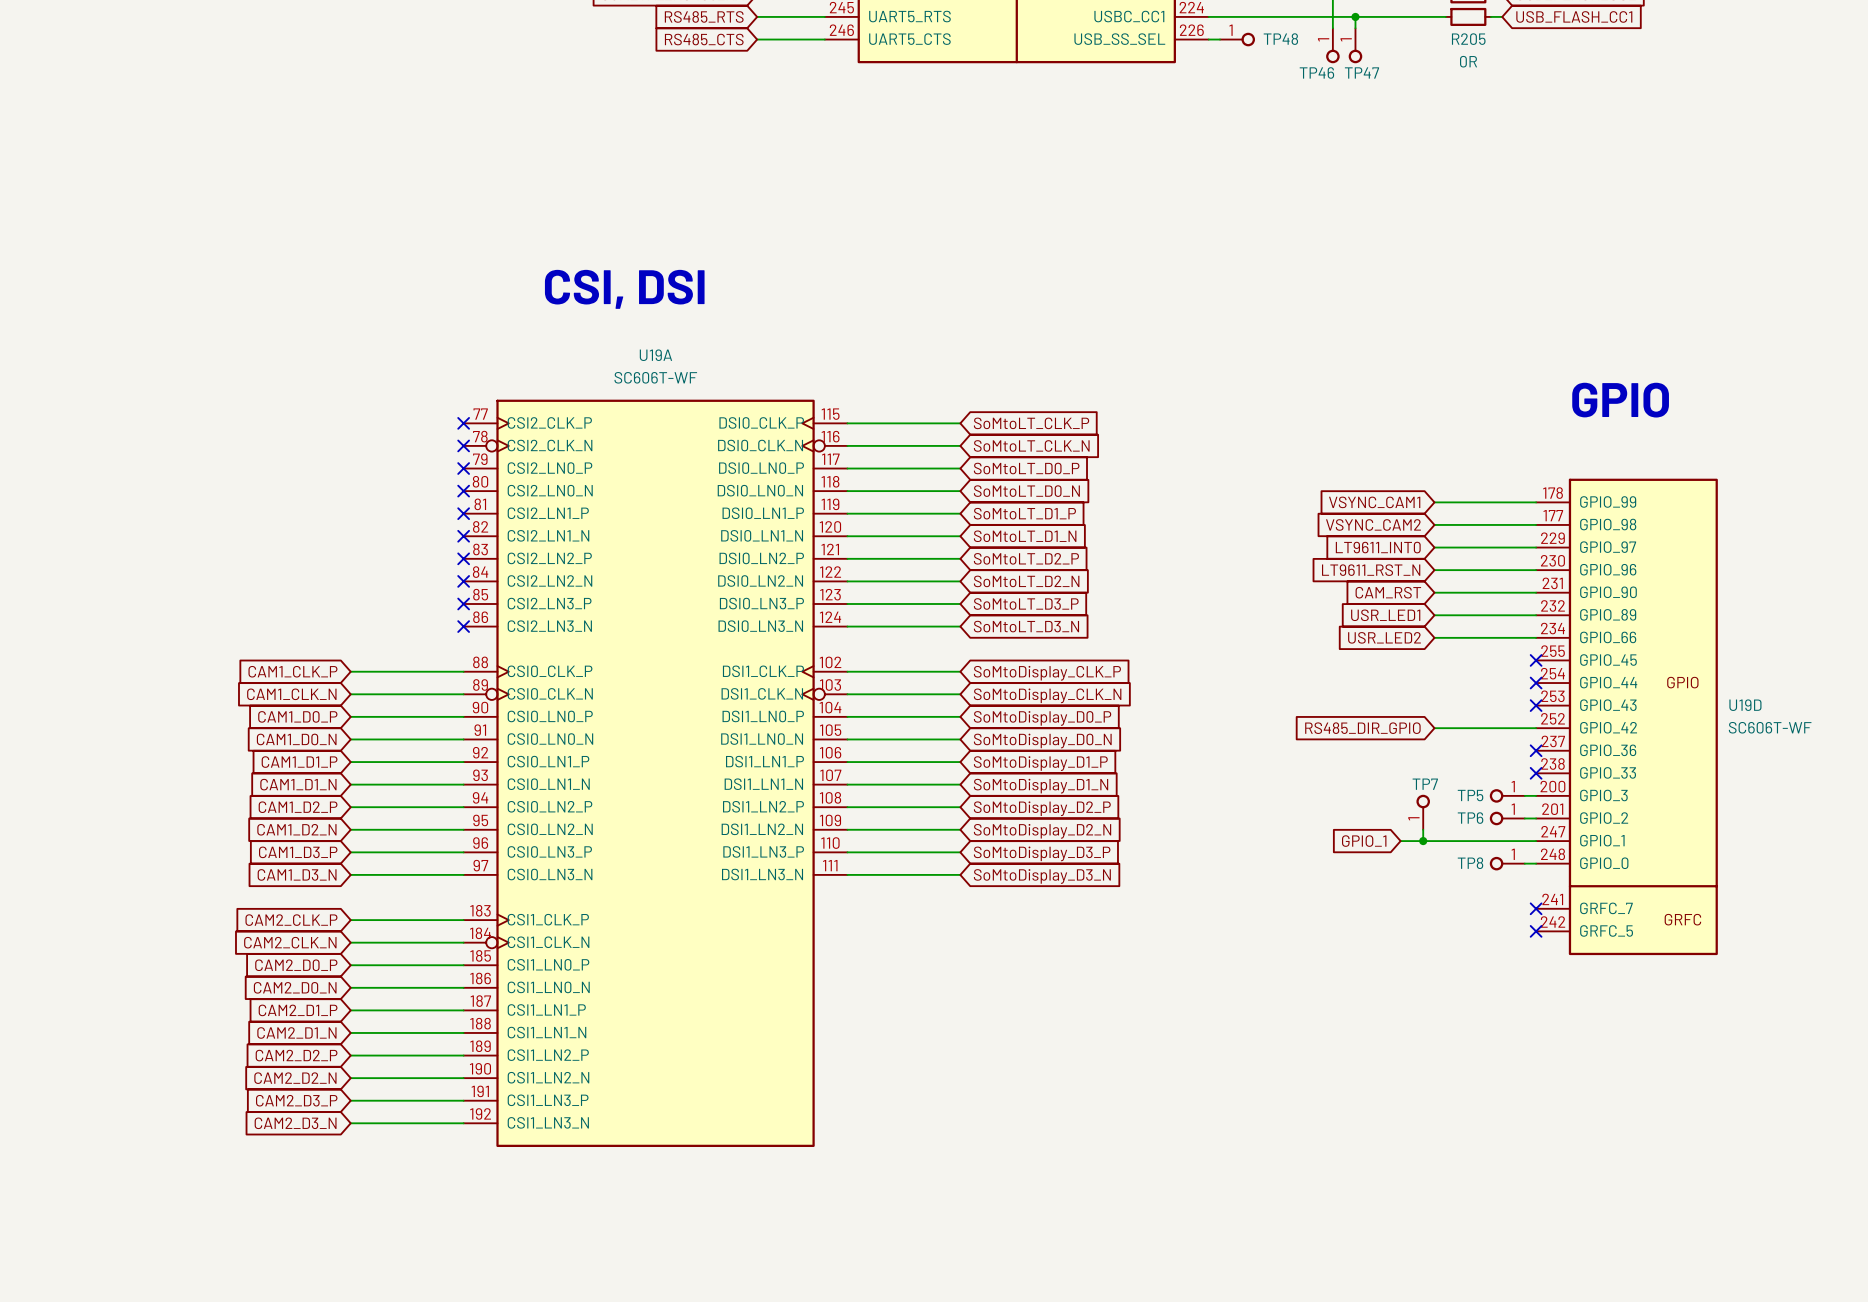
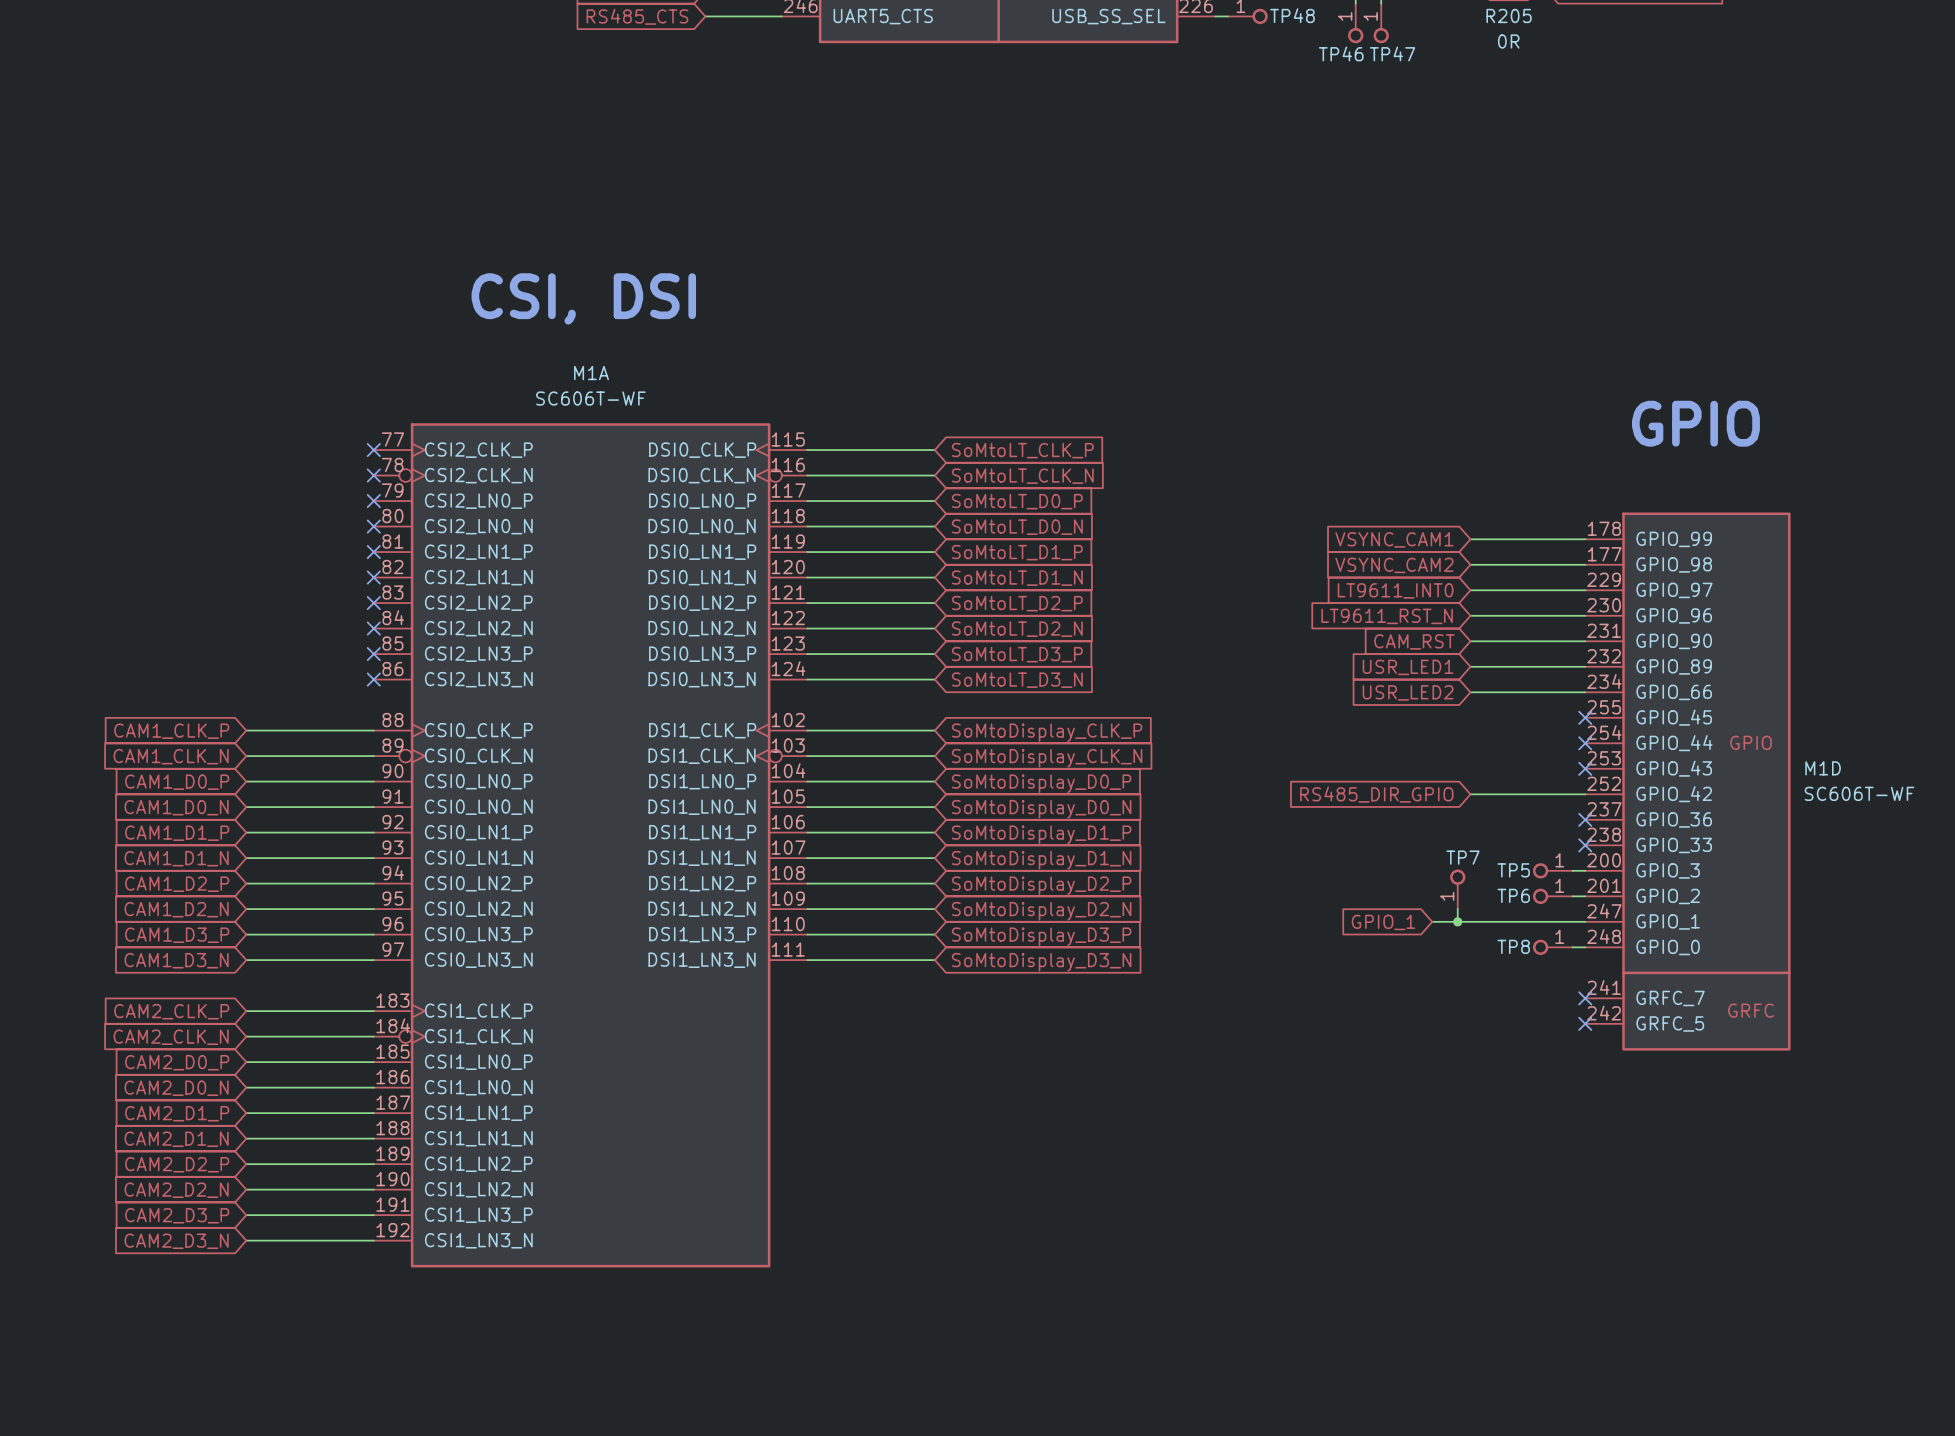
U19A name: U19A (655, 355) -> M1A (591, 373)
U19D name: U19D (1745, 705) -> M1D (1823, 768)

